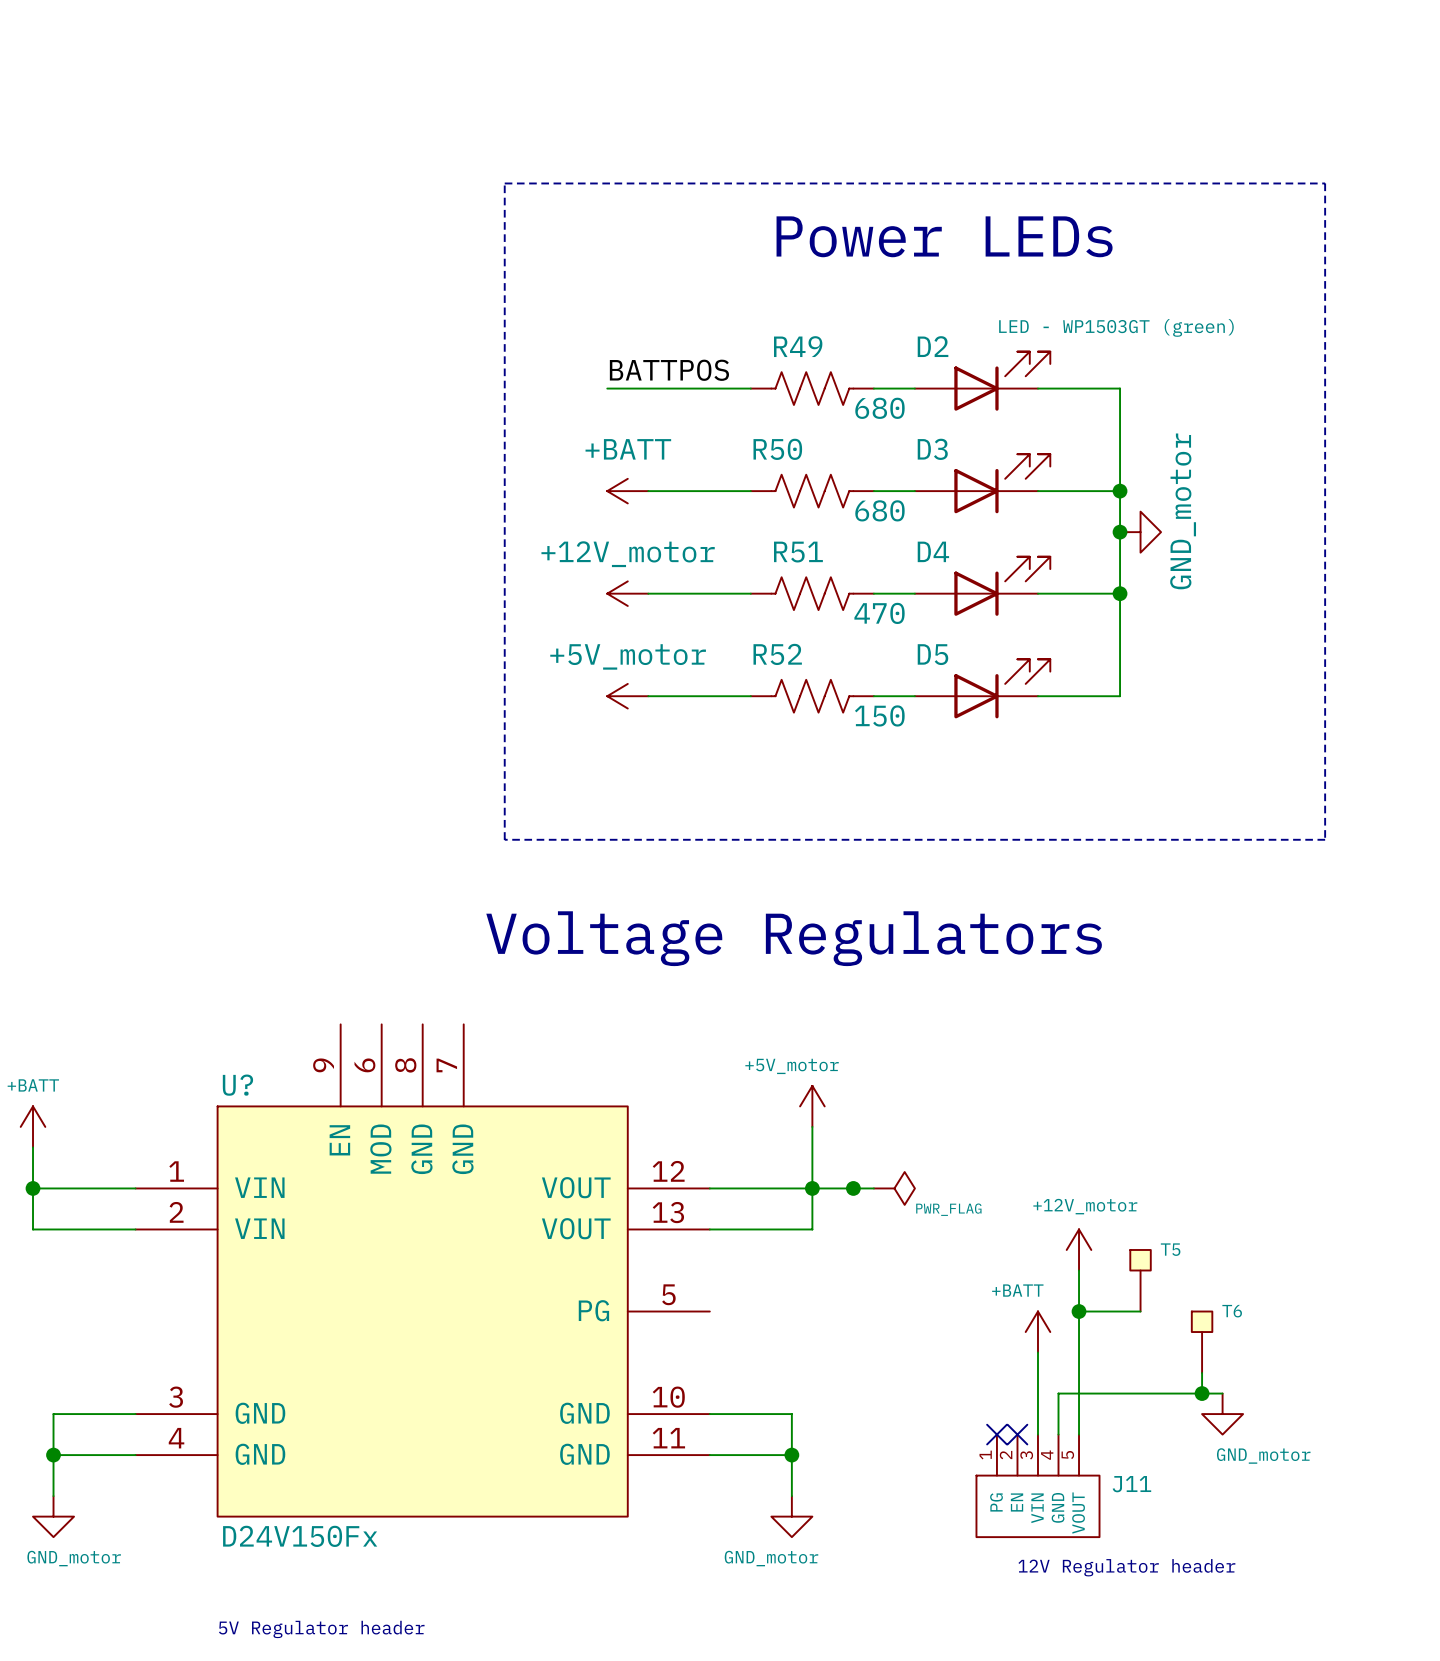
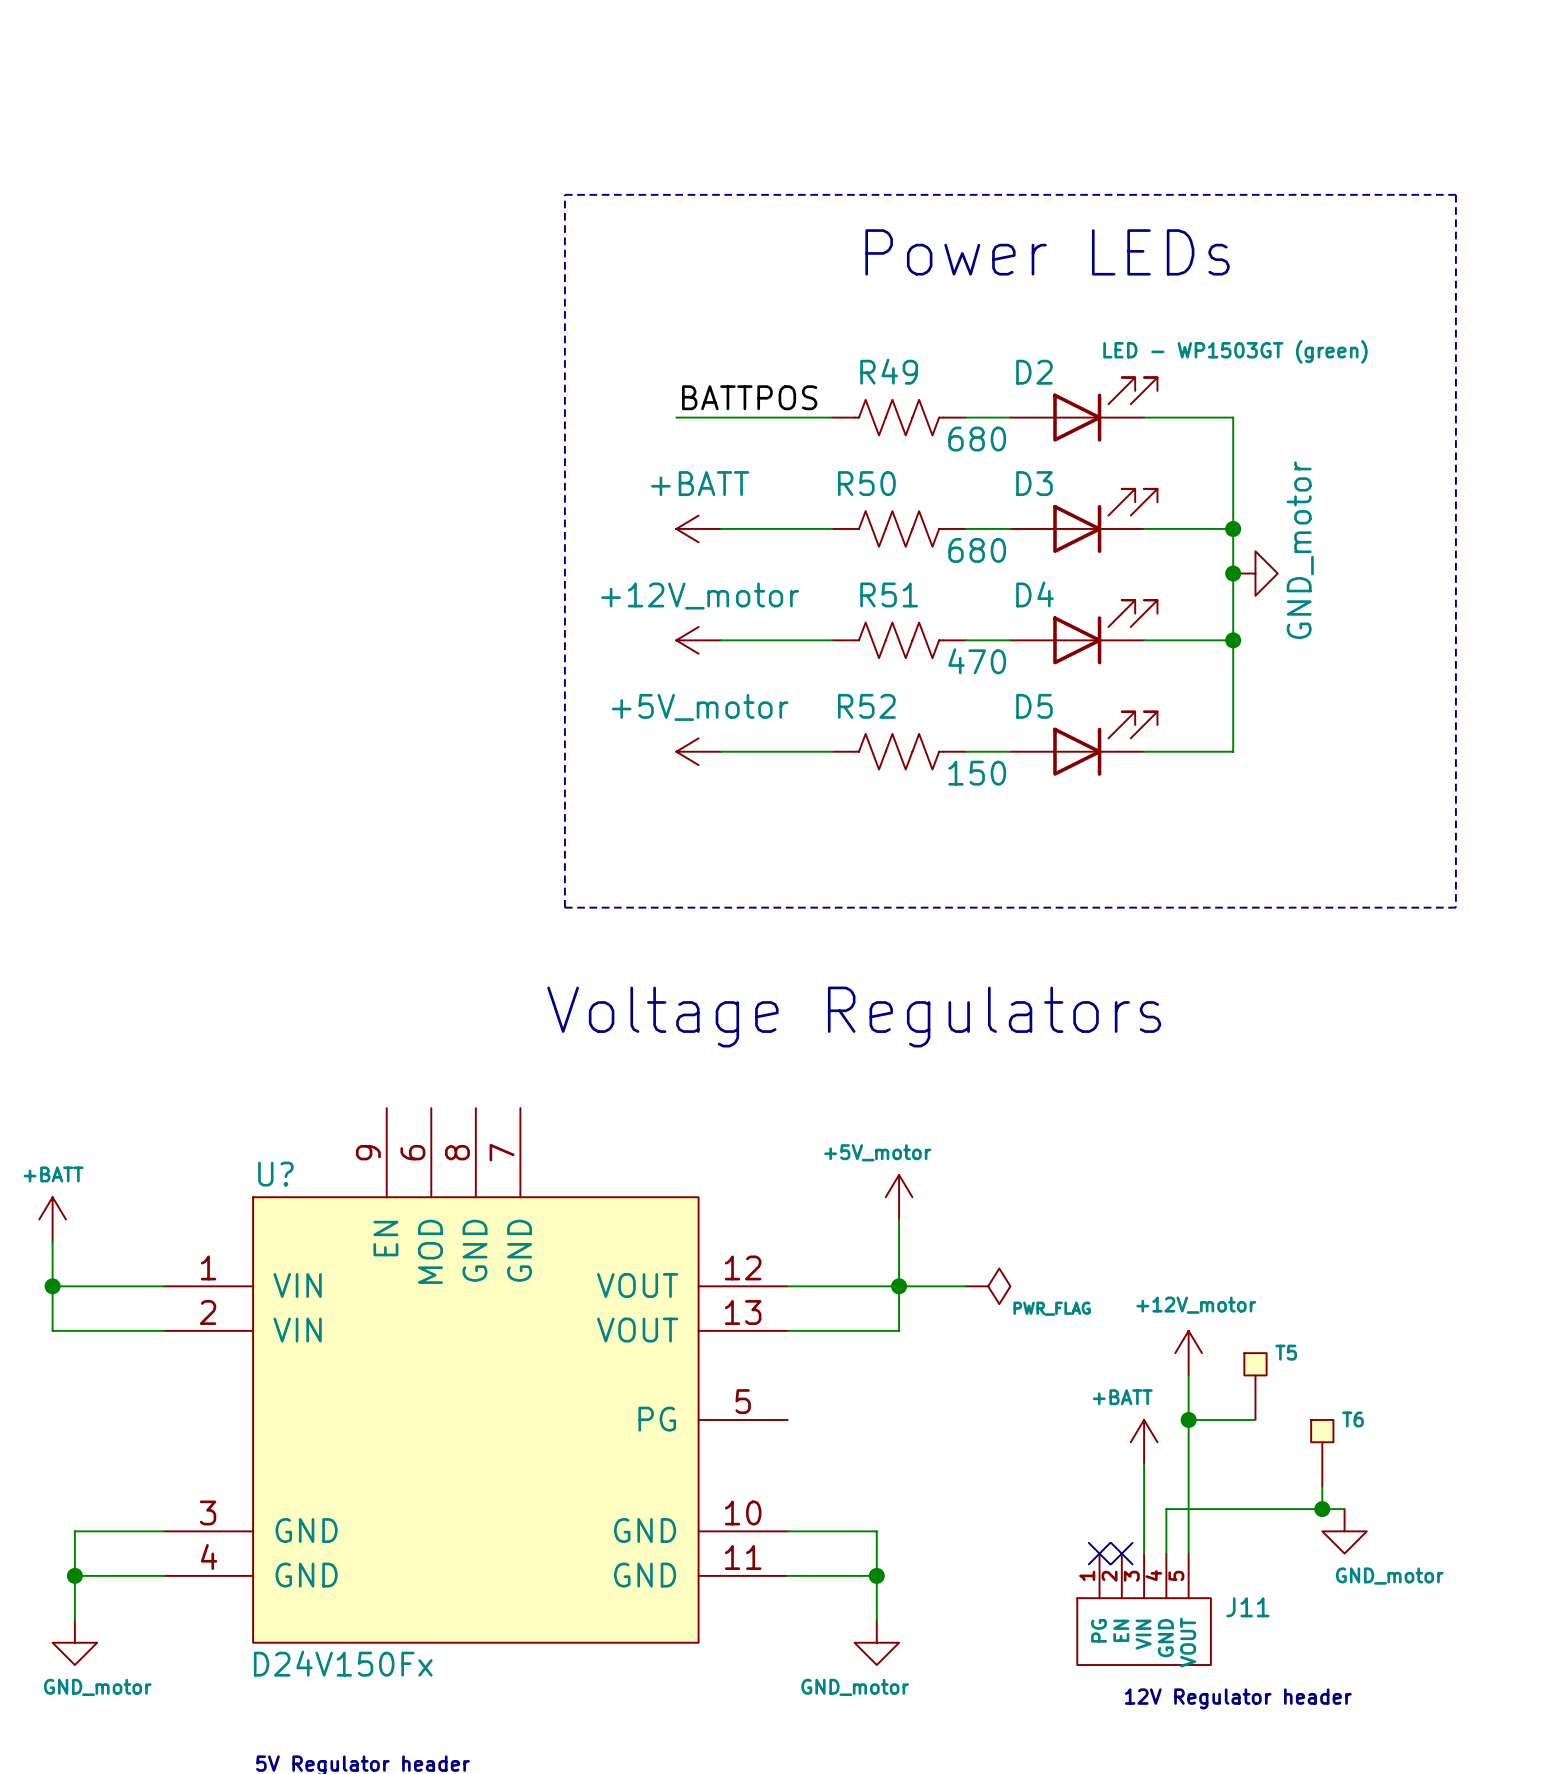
junction: (853, 1188) -> none

